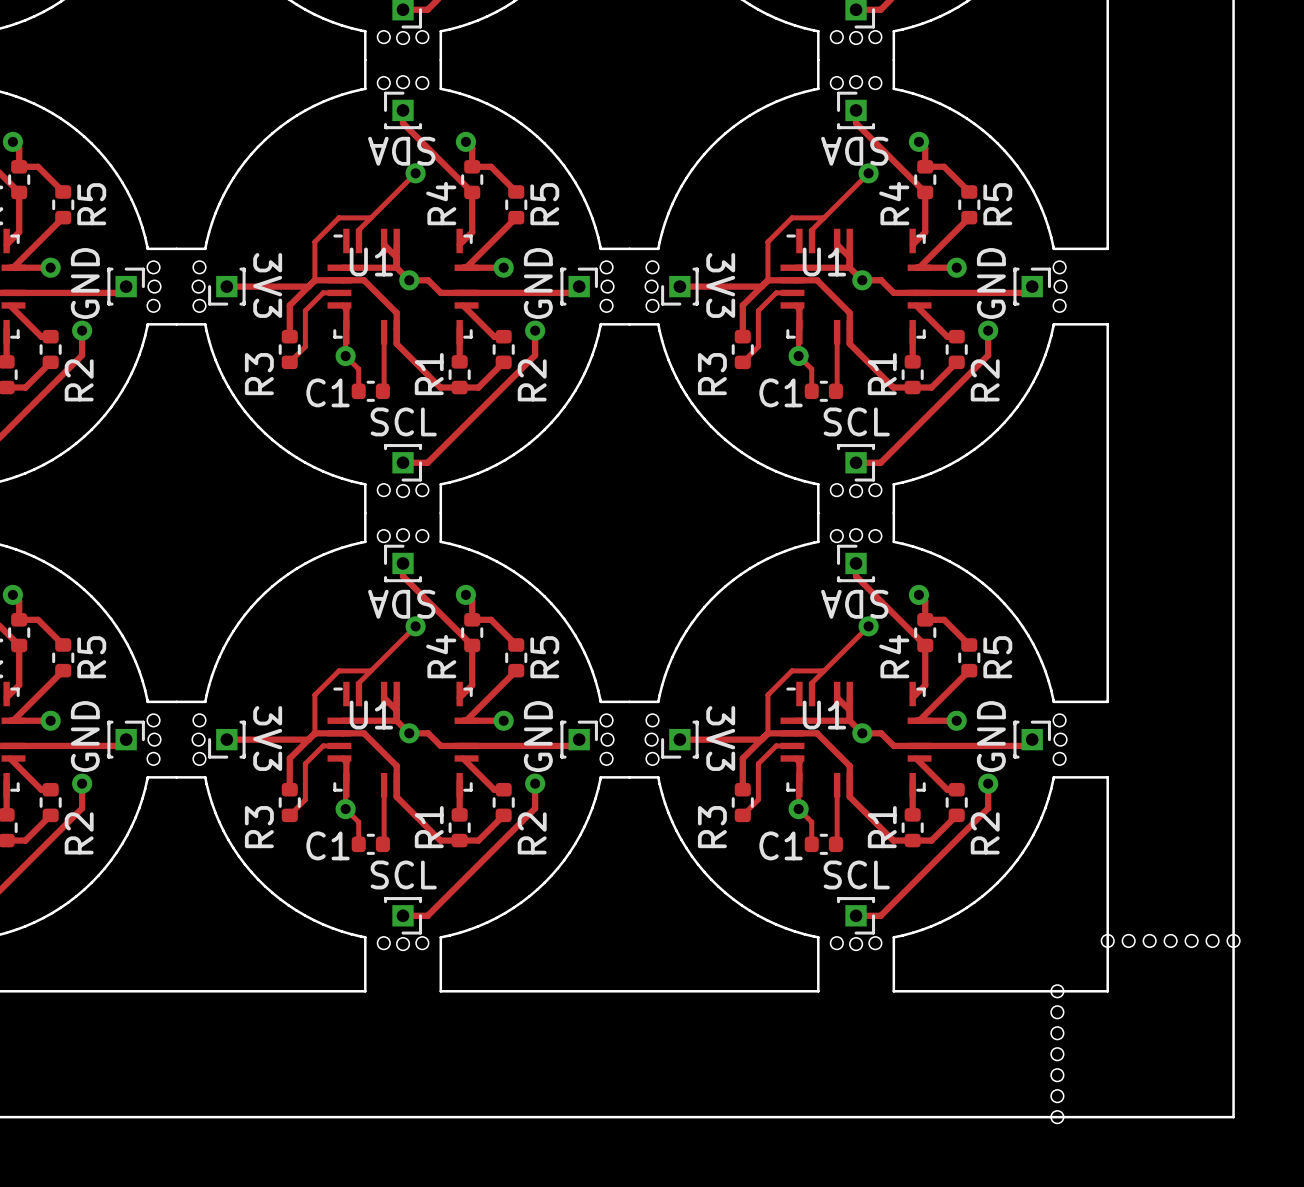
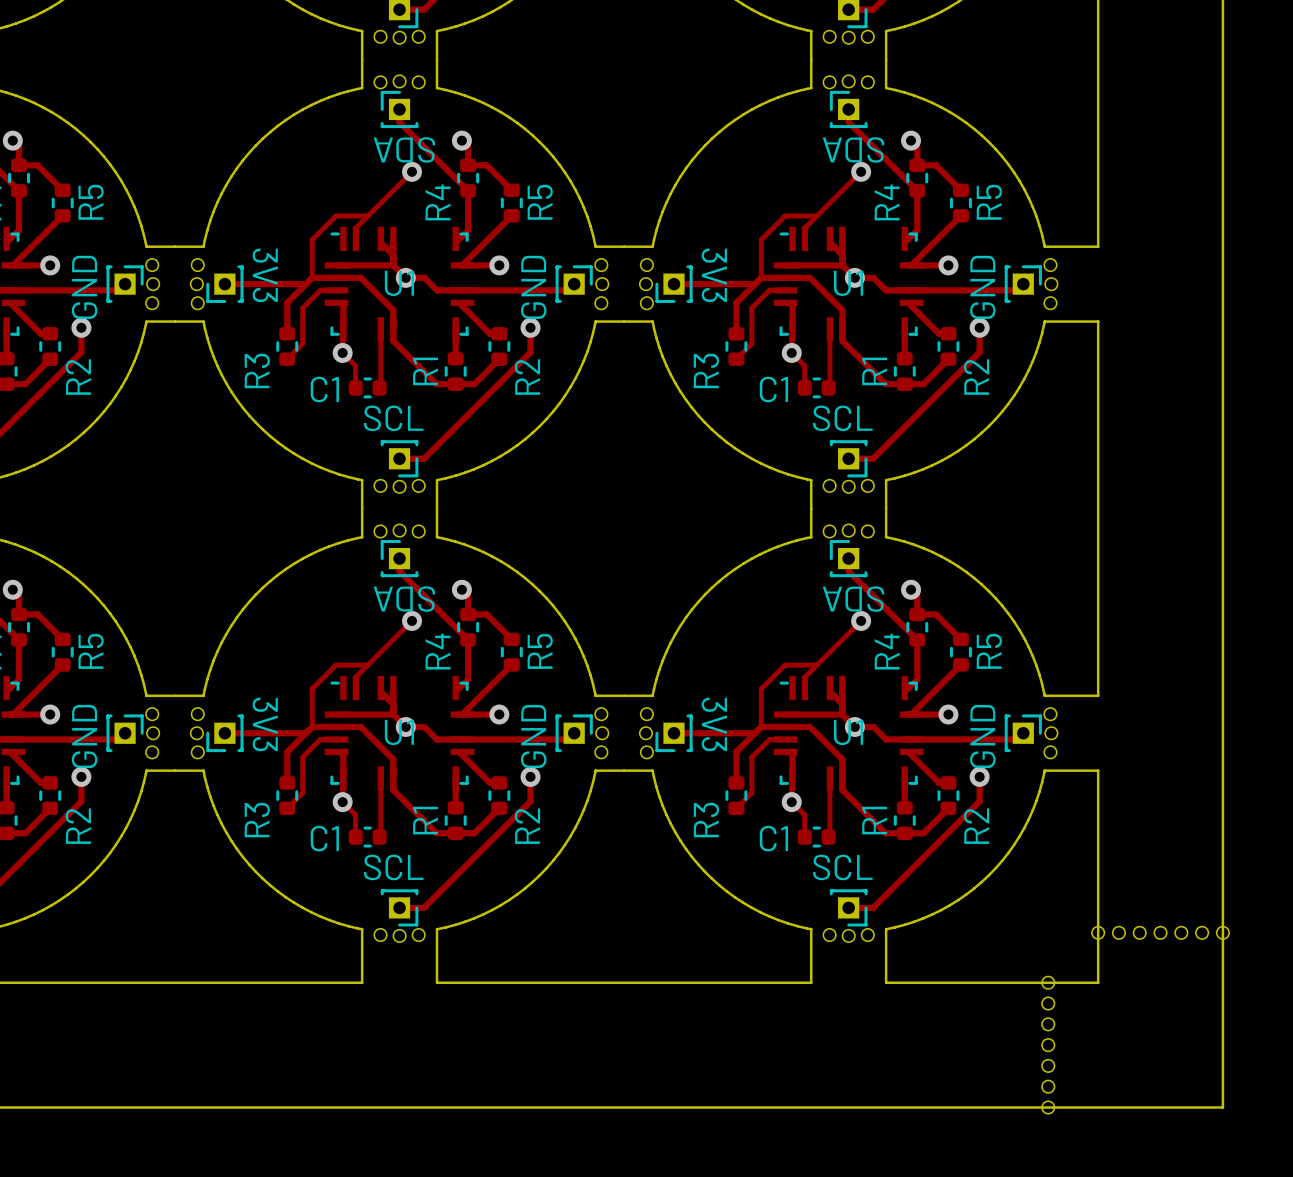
U1 name position: U1 (371, 262) -> U1 (399, 283)
U1 name position: U1 (824, 262) -> U1 (848, 283)
U1 name position: U1 (371, 715) -> U1 (399, 732)
U1 name position: U1 (824, 715) -> U1 (848, 732)

